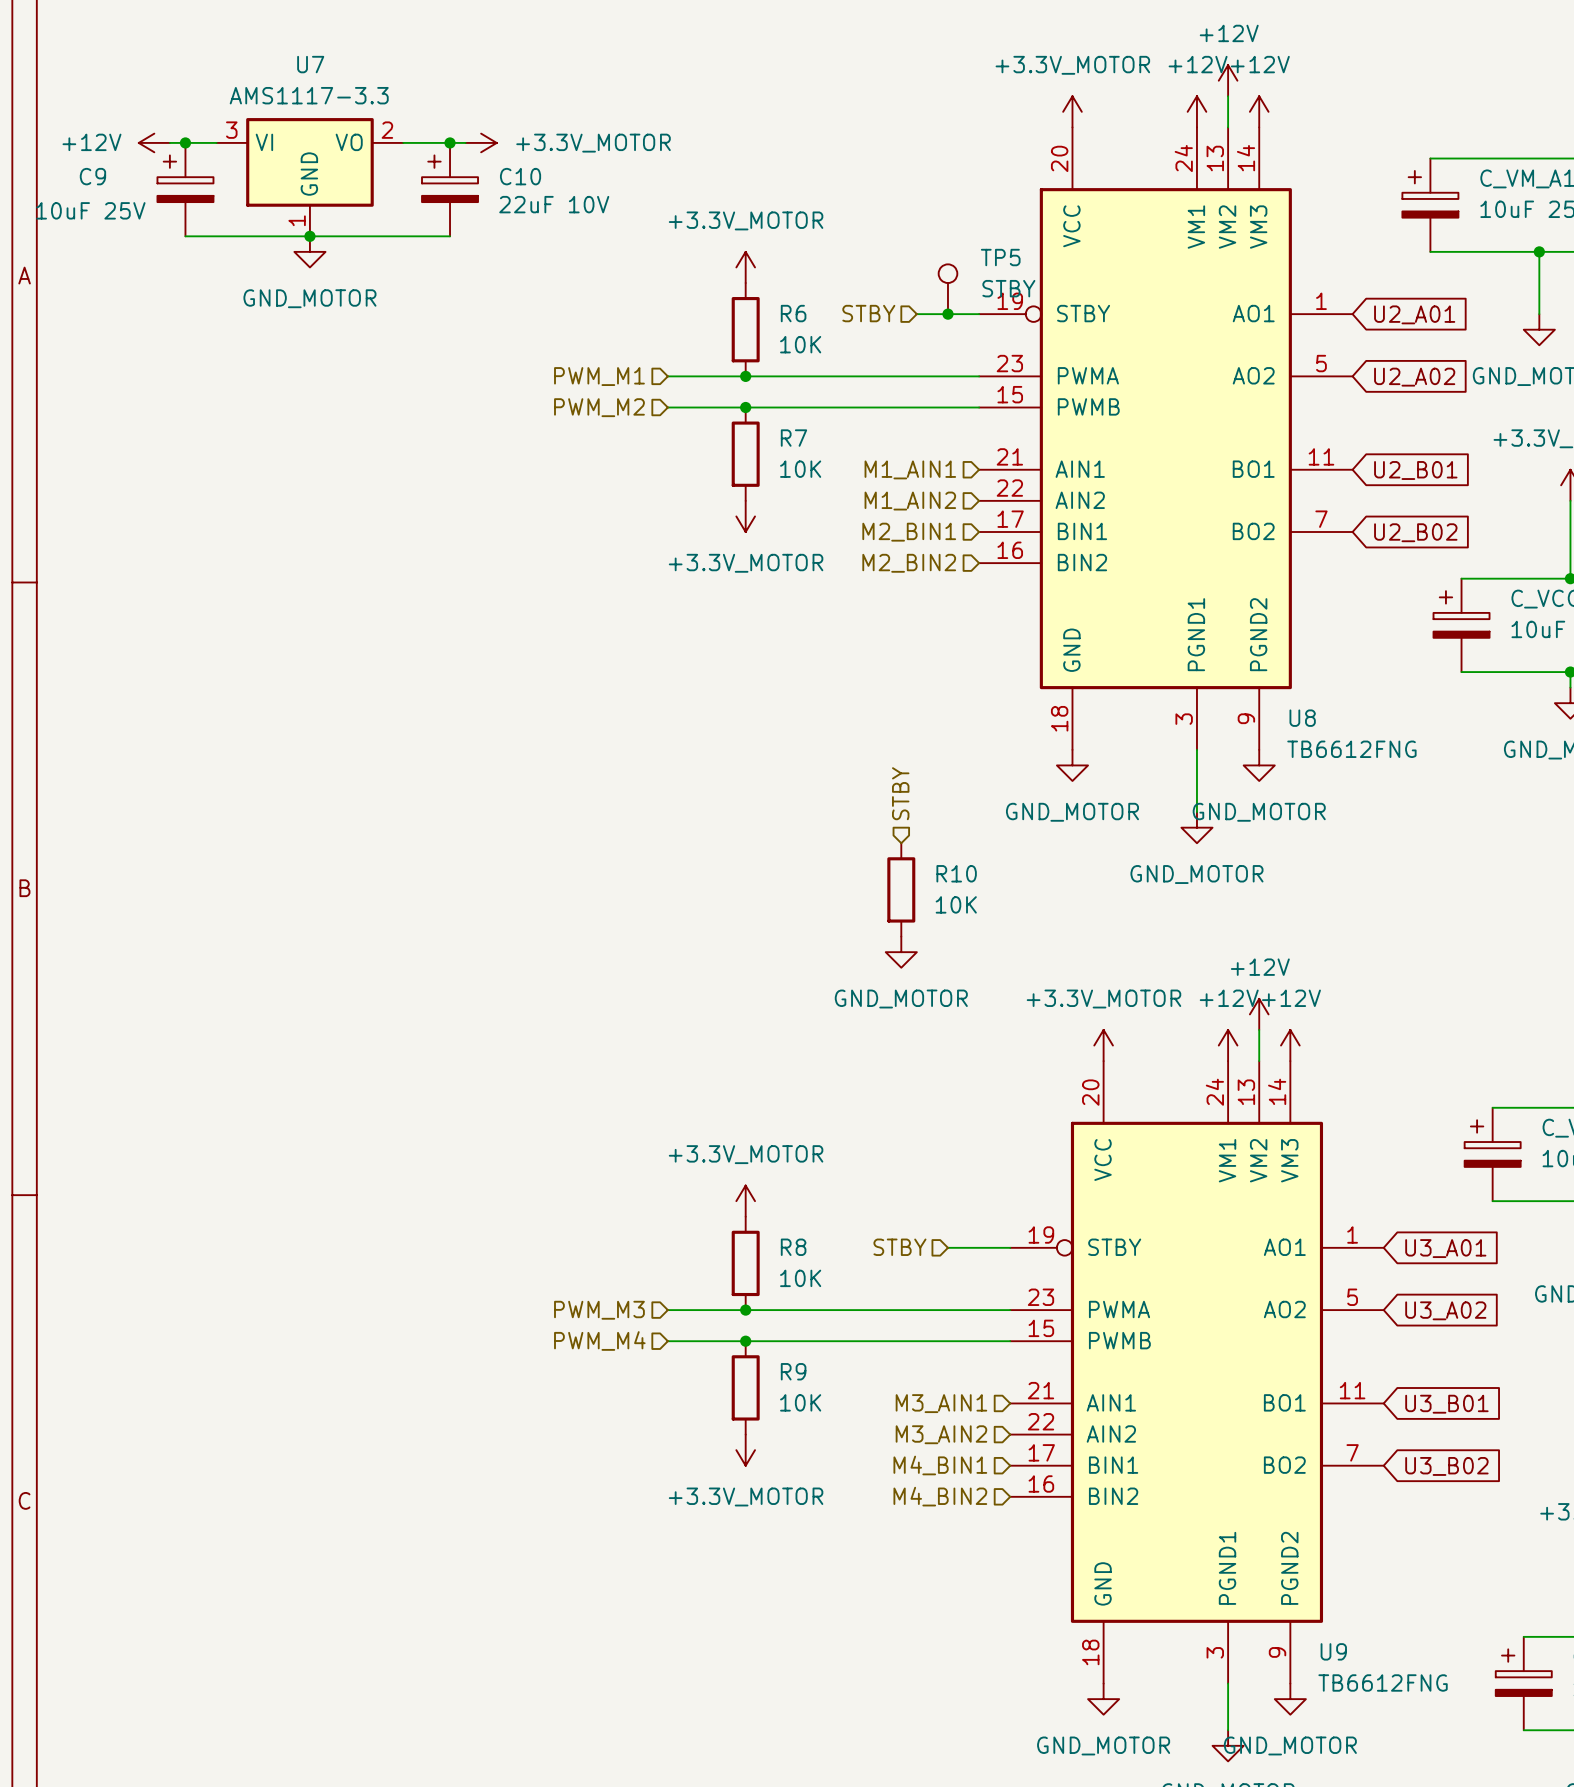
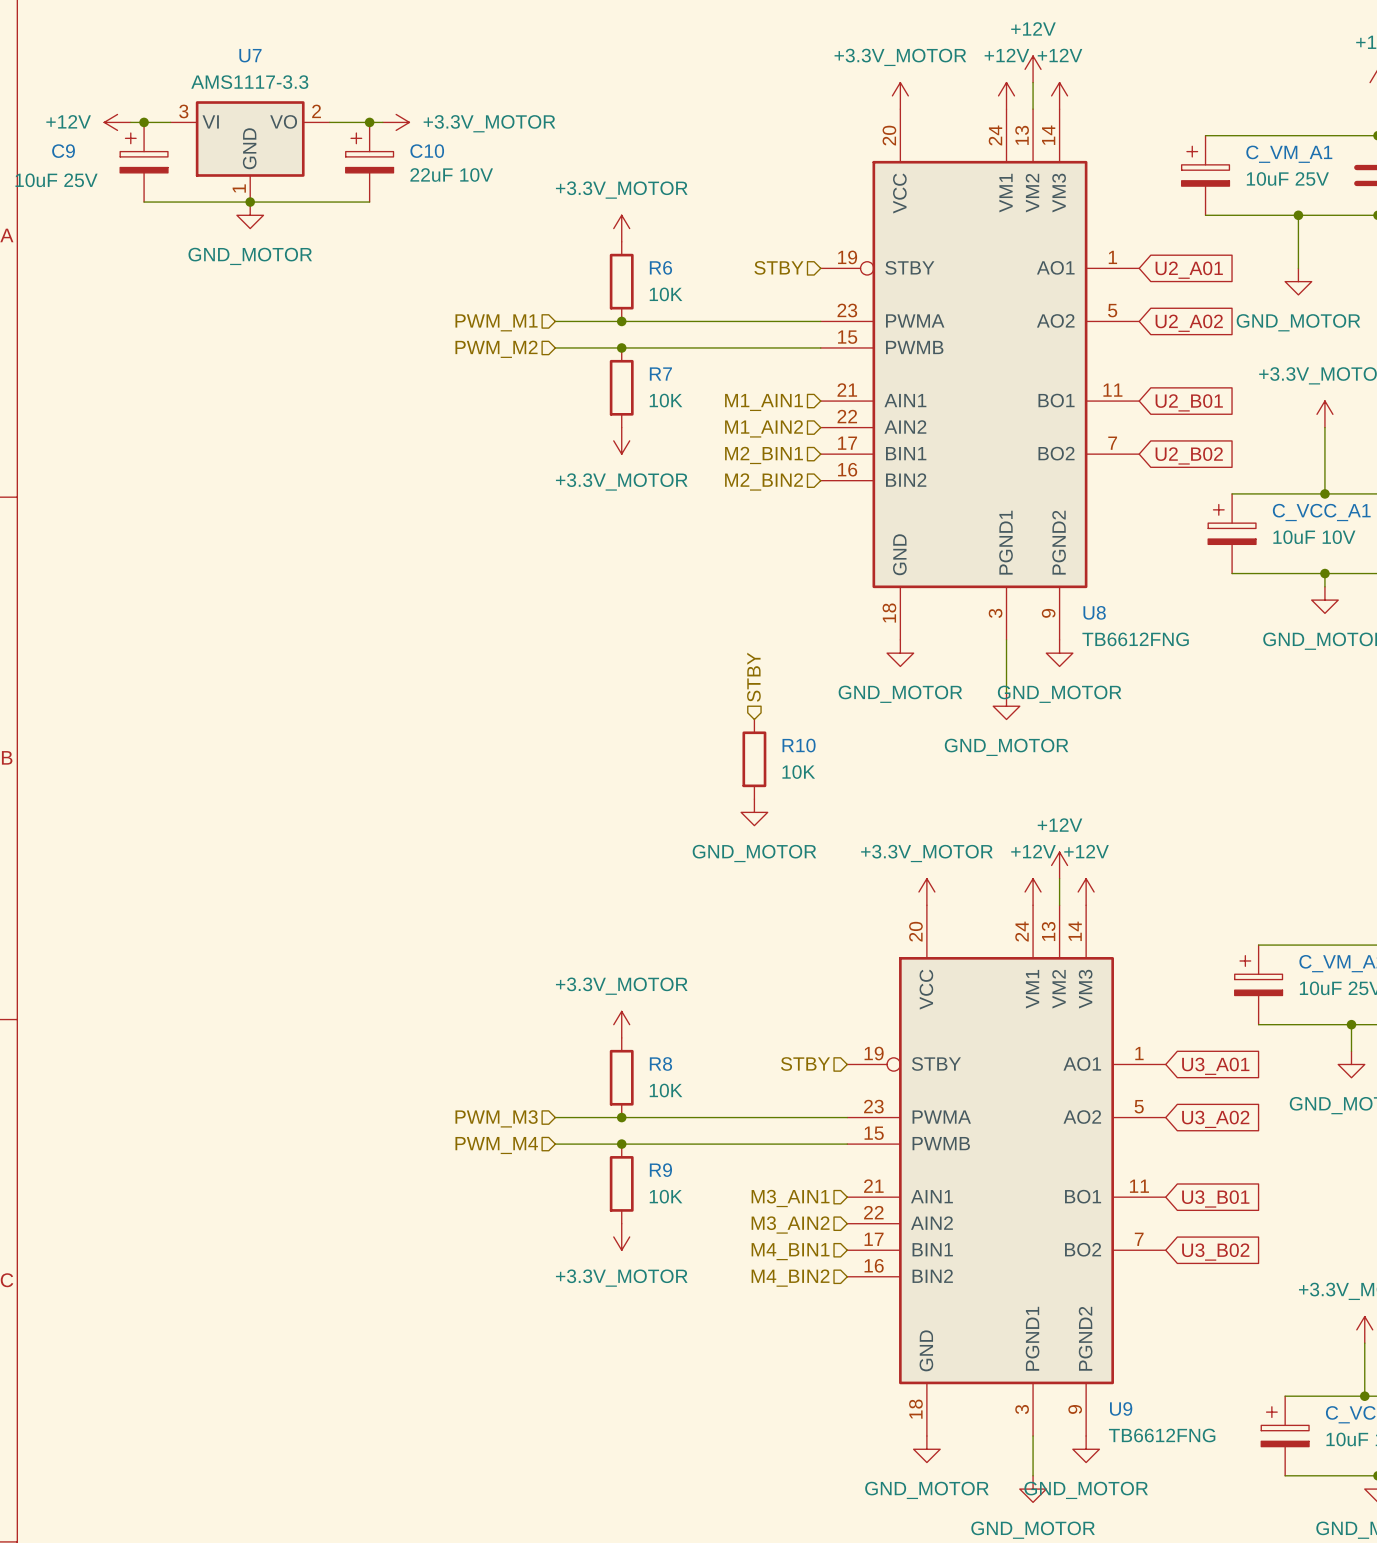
TP5: STBY (947, 289) -> none
hierarchical label position: STBY (868, 313) -> STBY (778, 267)
wire: (916, 314) (979, 314) -> none
junction: (947, 314) -> none
hierarchical label position: STBY (899, 1247) -> STBY (805, 1063)
wire: (947, 1247) (1010, 1247) -> none

